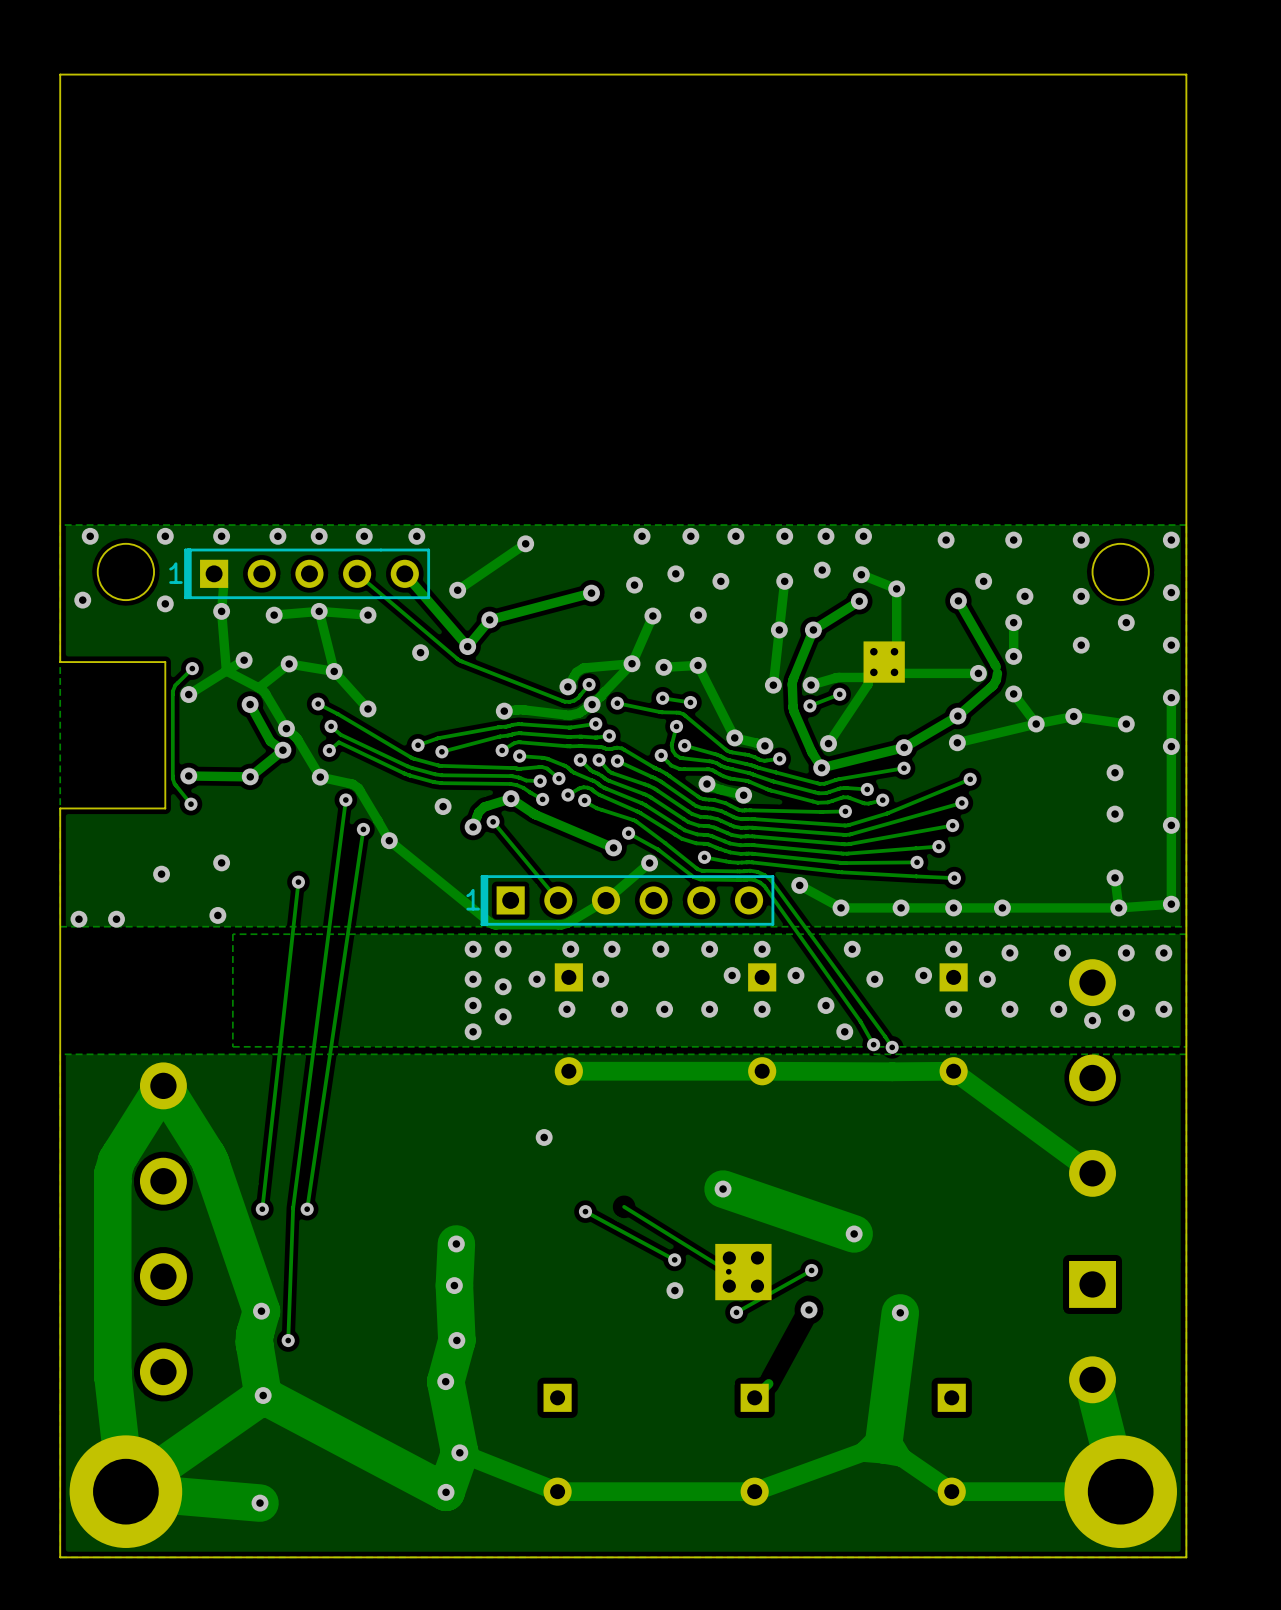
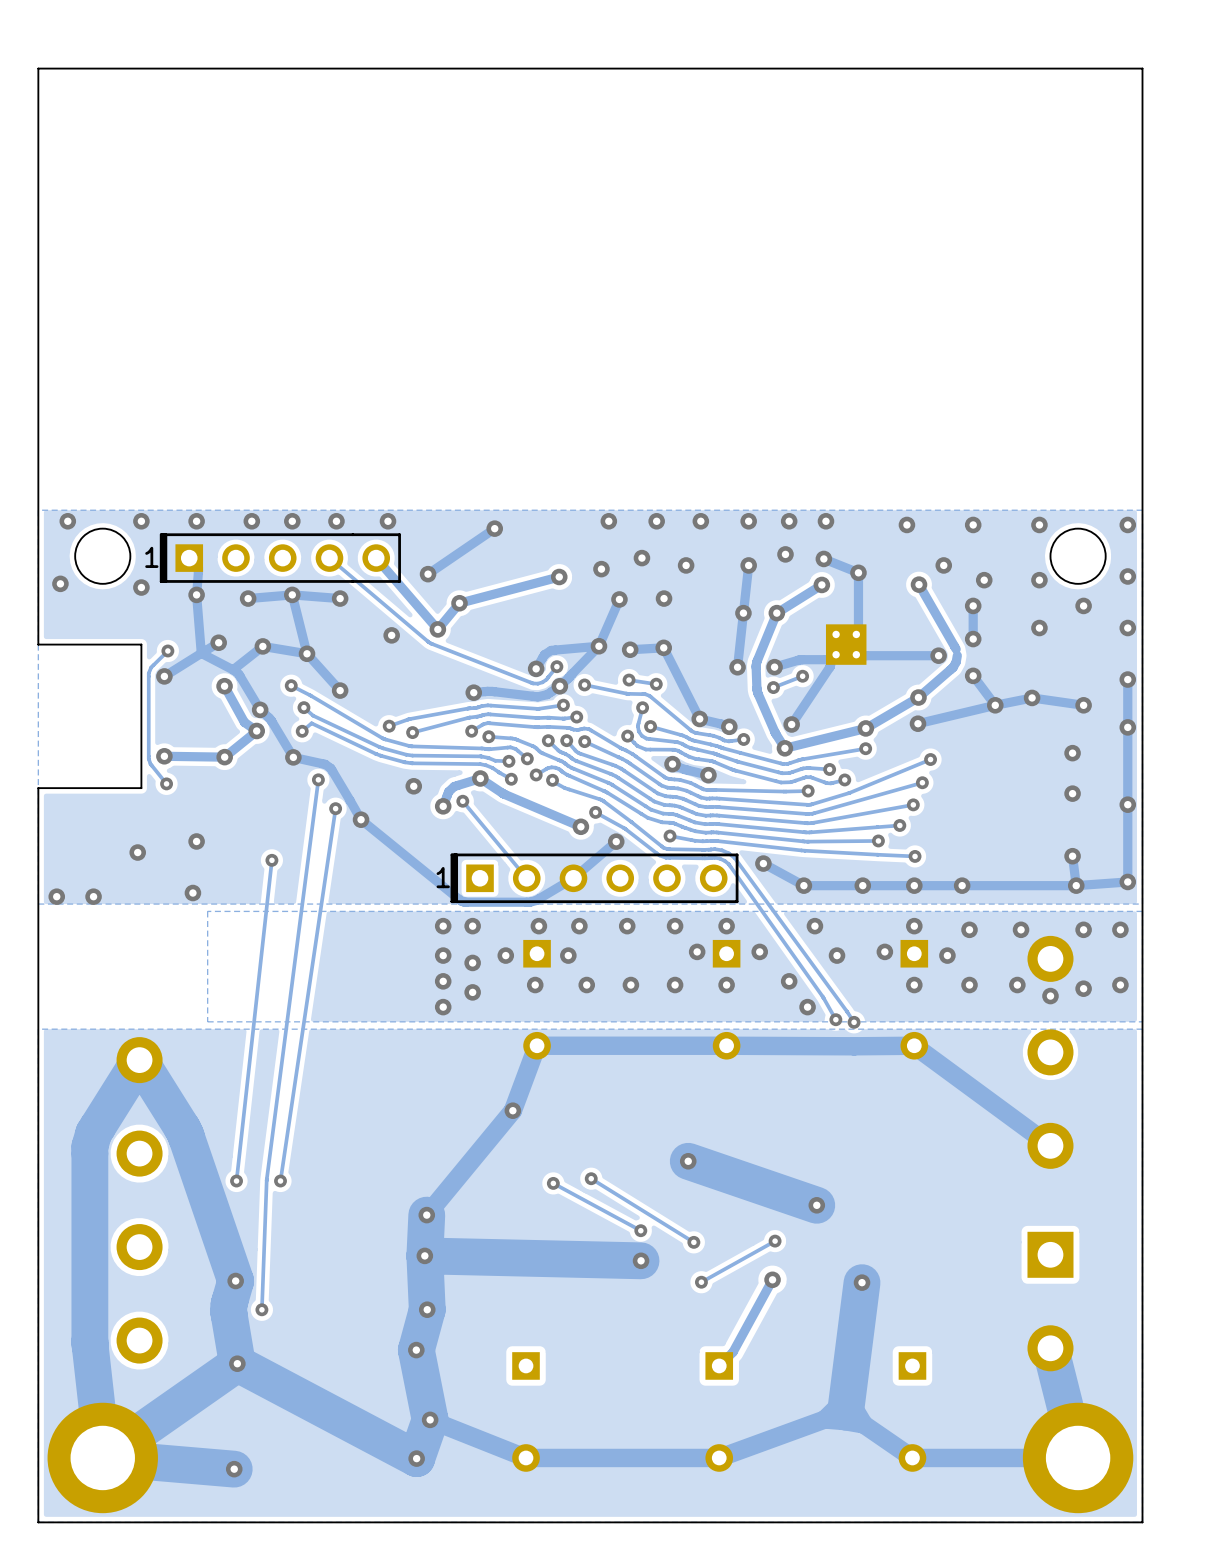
track: none -> (537, 1045) (512, 1110) (426, 1215)
via: none -> (591, 1178)
part: (743, 1272) -> none
track: none -> (424, 1255) (641, 1260)
track: none -> (772, 1279) (733, 1352)

